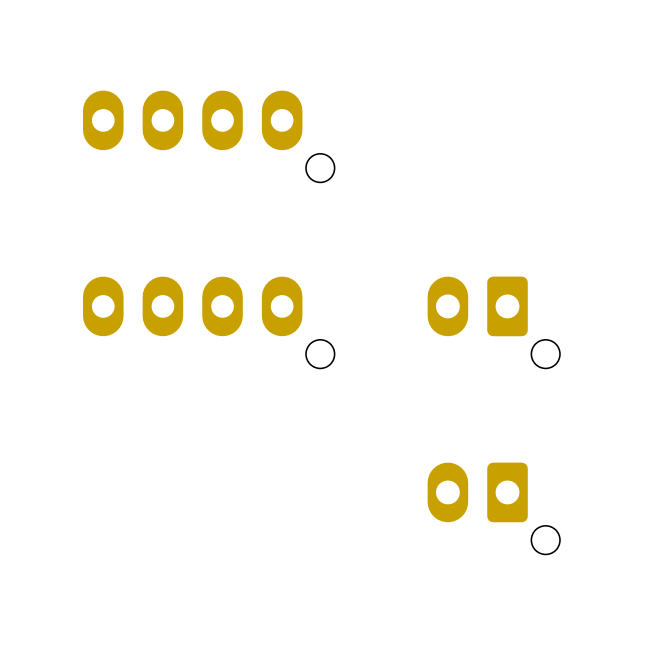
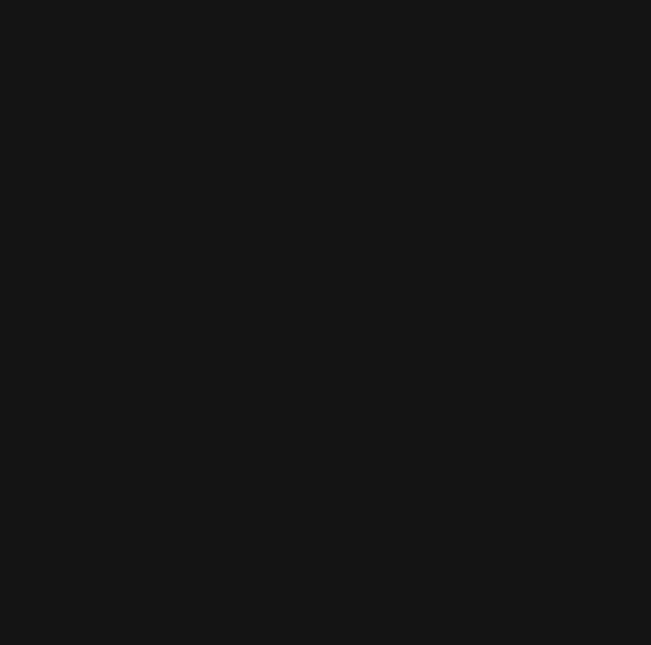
part: (208, 136) -> none
part: (208, 322) -> none
part: (493, 322) -> none
part: (493, 508) -> none

